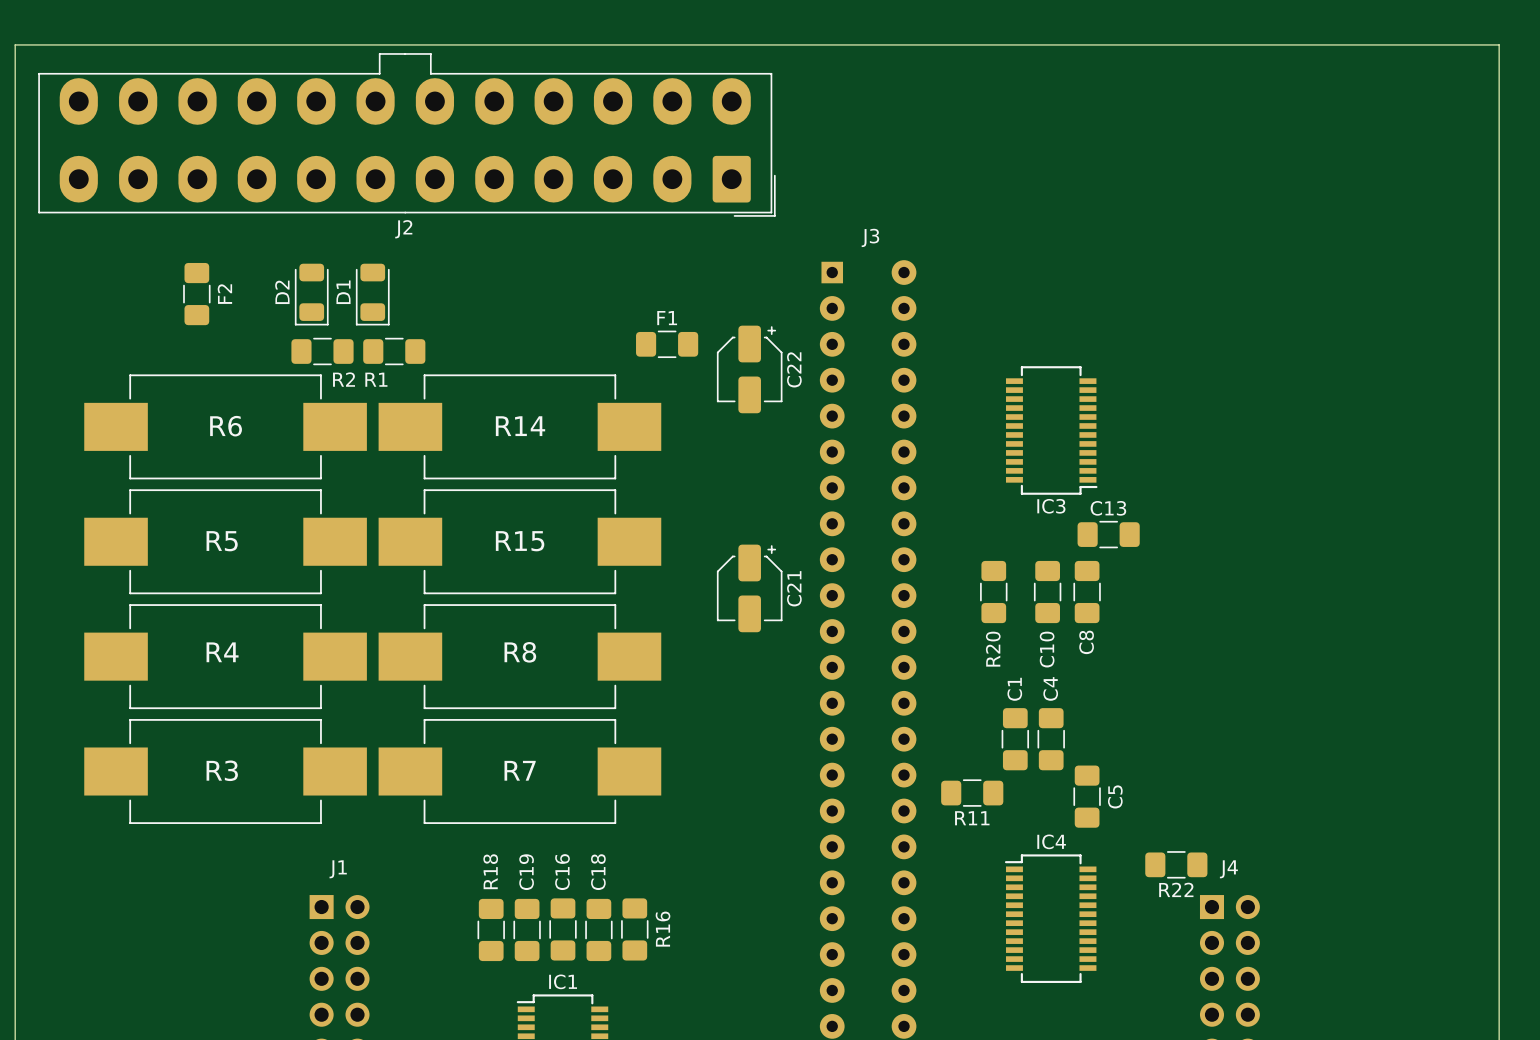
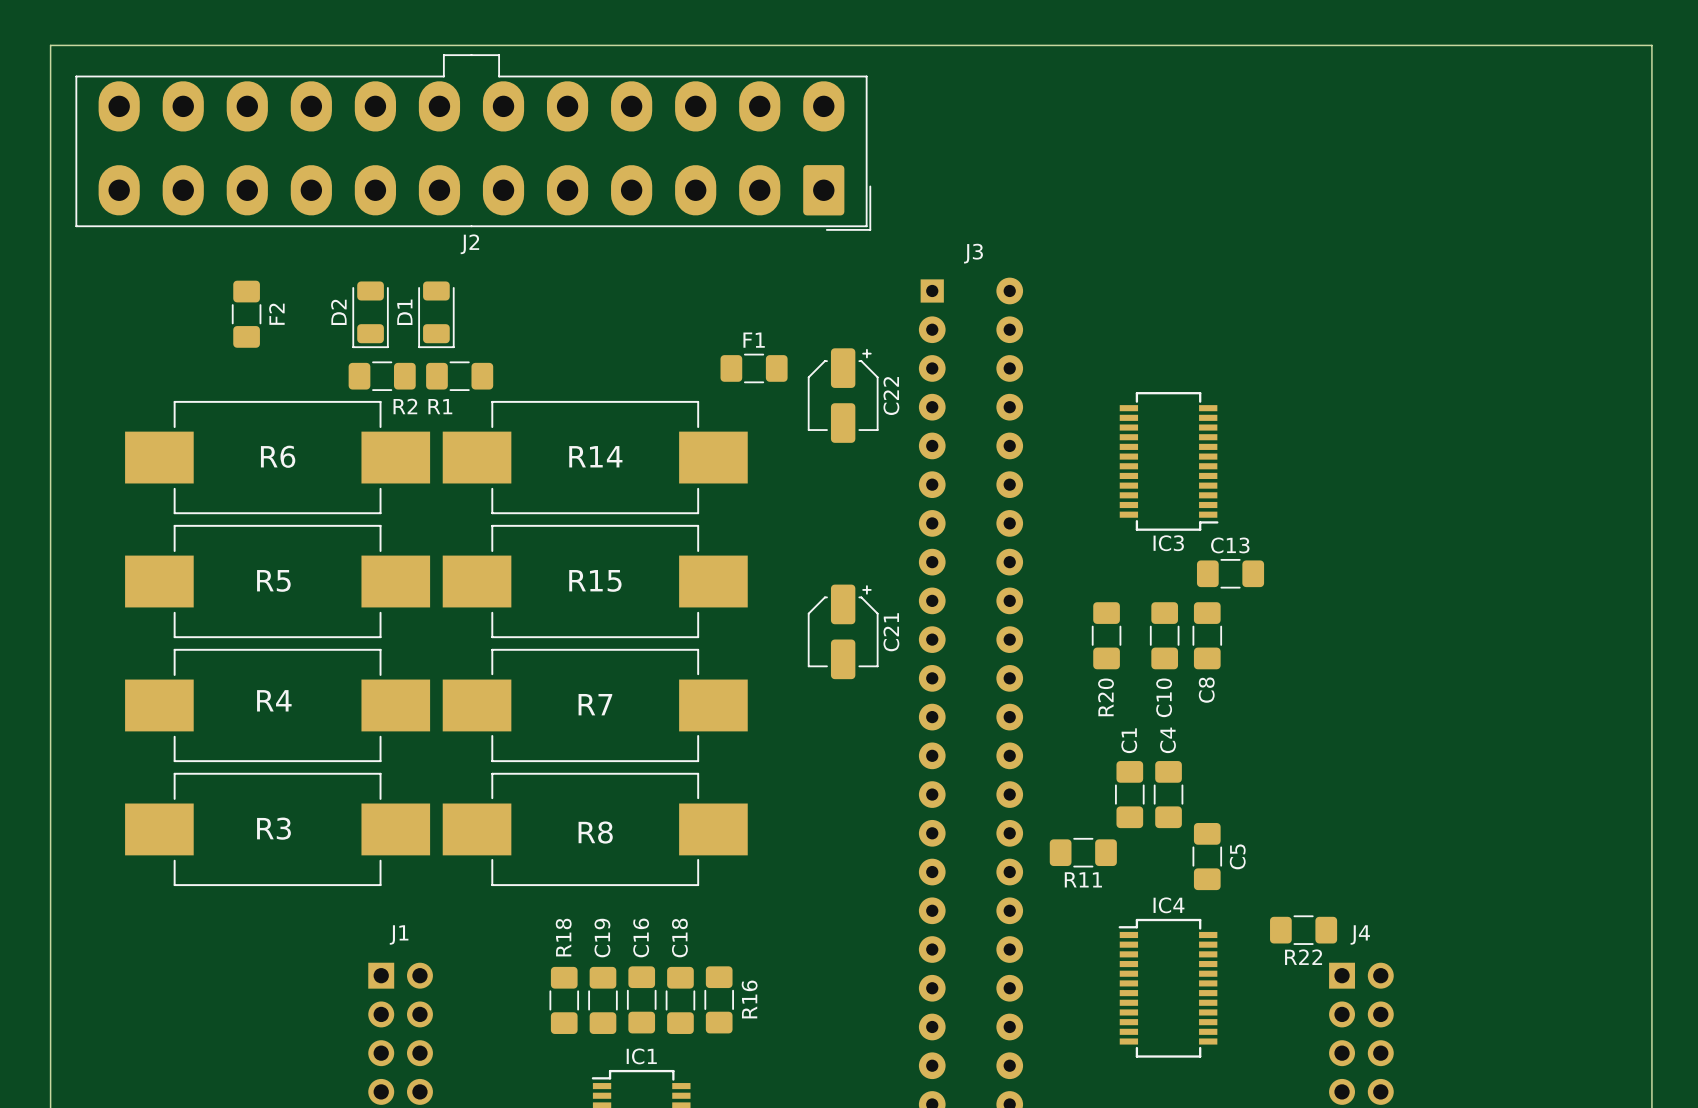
R8 rotation: 0° (519, 656) -> 180° (595, 829)
R7 rotation: 0° (519, 771) -> 180° (595, 705)

